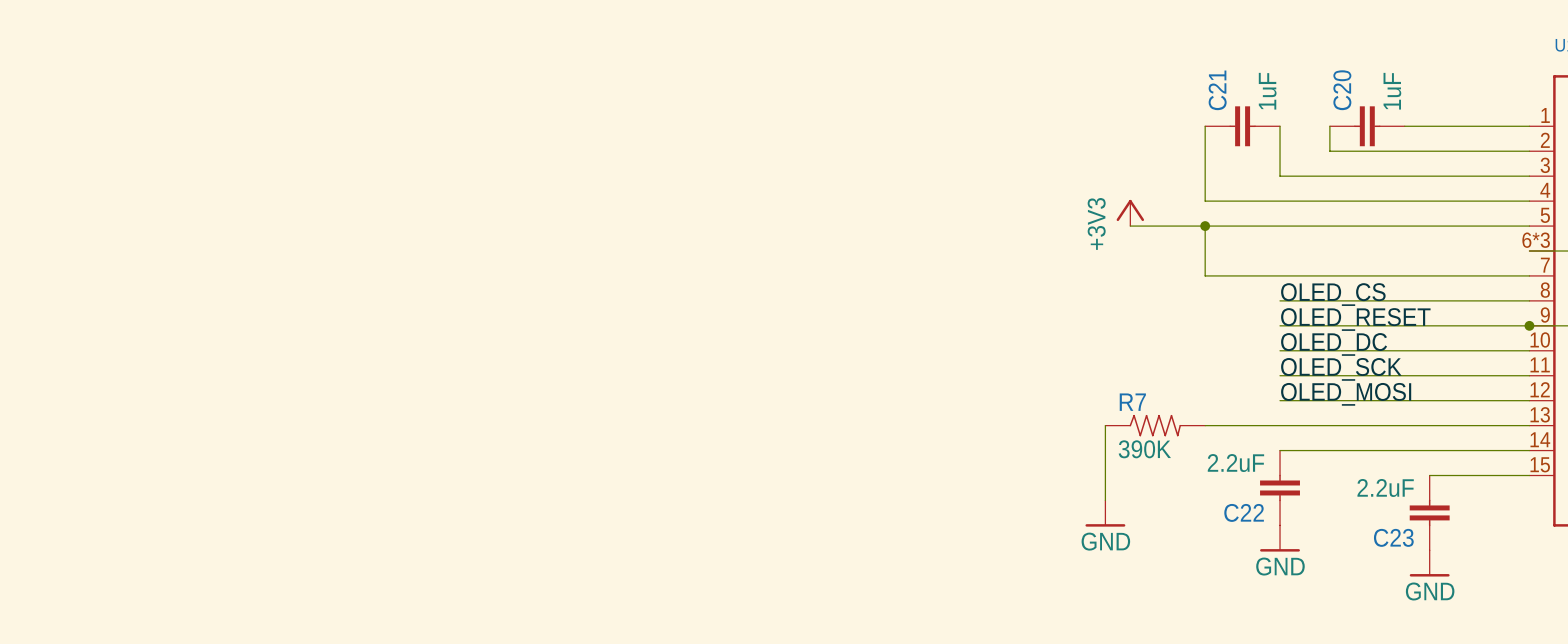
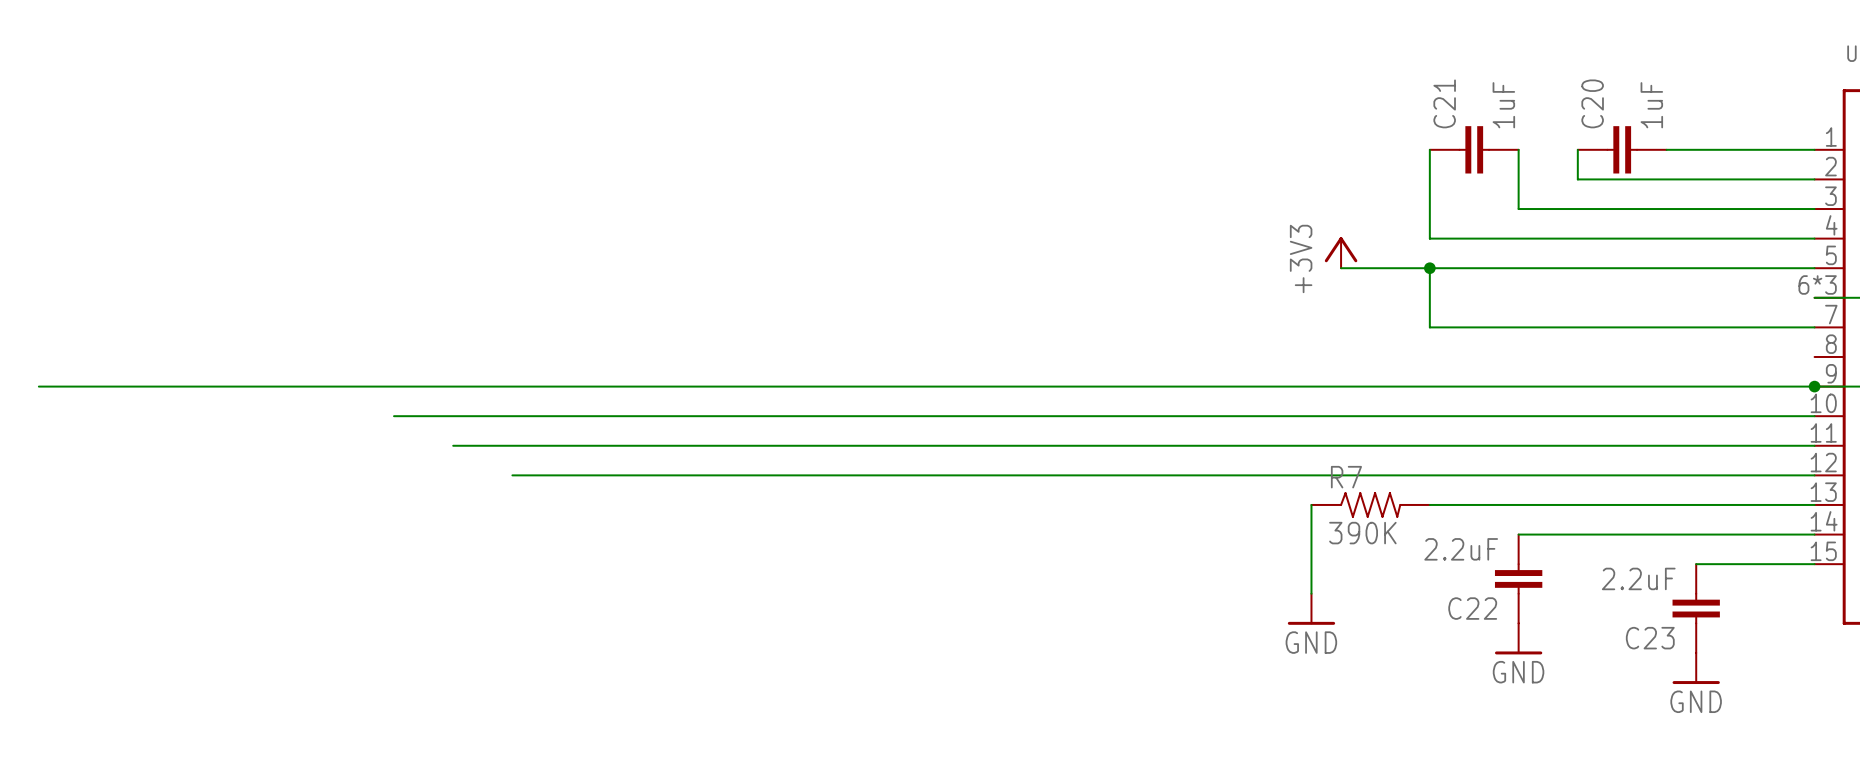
label: OLED_CS (1333, 294) -> none
wire: (1280, 300) (1529, 300) -> none
label: OLED_RESET (1355, 319) -> none
wire: none -> (38, 386) (1518, 386)
label: OLED_DC (1334, 344) -> none
wire: none -> (394, 416) (1518, 416)
label: OLED_SCK (1341, 369) -> none
wire: none -> (453, 445) (1518, 445)
label: OLED_MOSI (1346, 394) -> none
wire: none -> (512, 475) (1518, 475)

